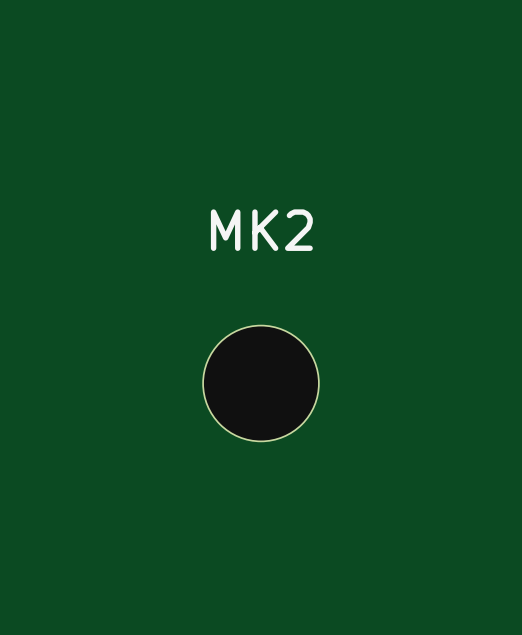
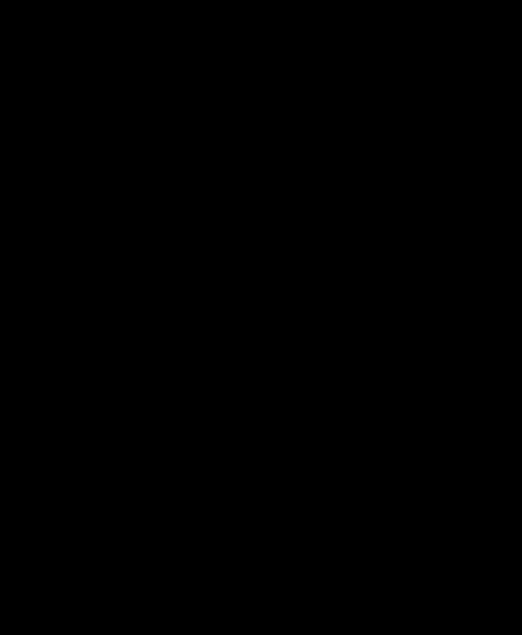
MK2: (260, 383) -> none

